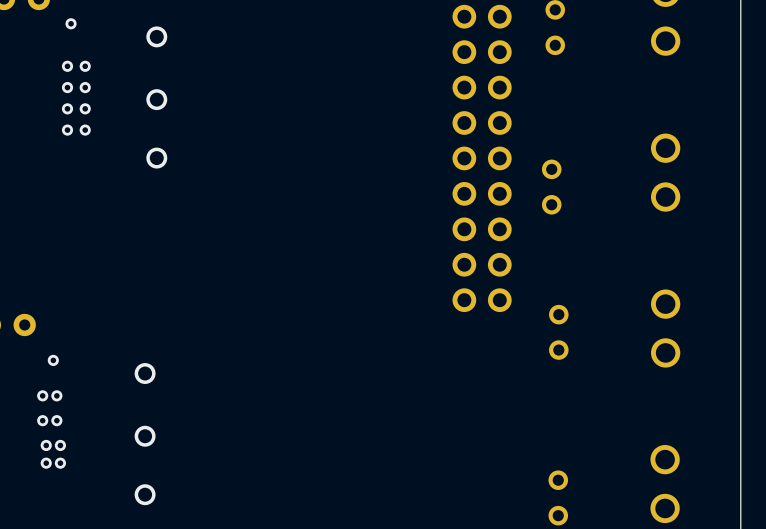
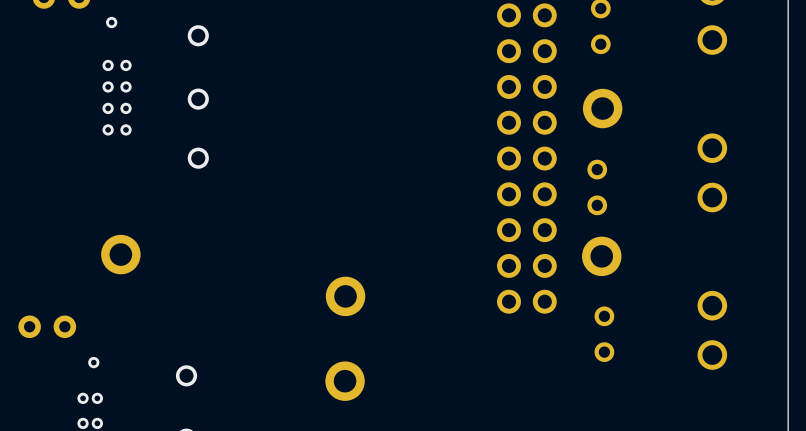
part: none -> (602, 108)
part: none -> (120, 254)
part: none -> (601, 256)
part: none -> (345, 296)
part: none -> (345, 381)

